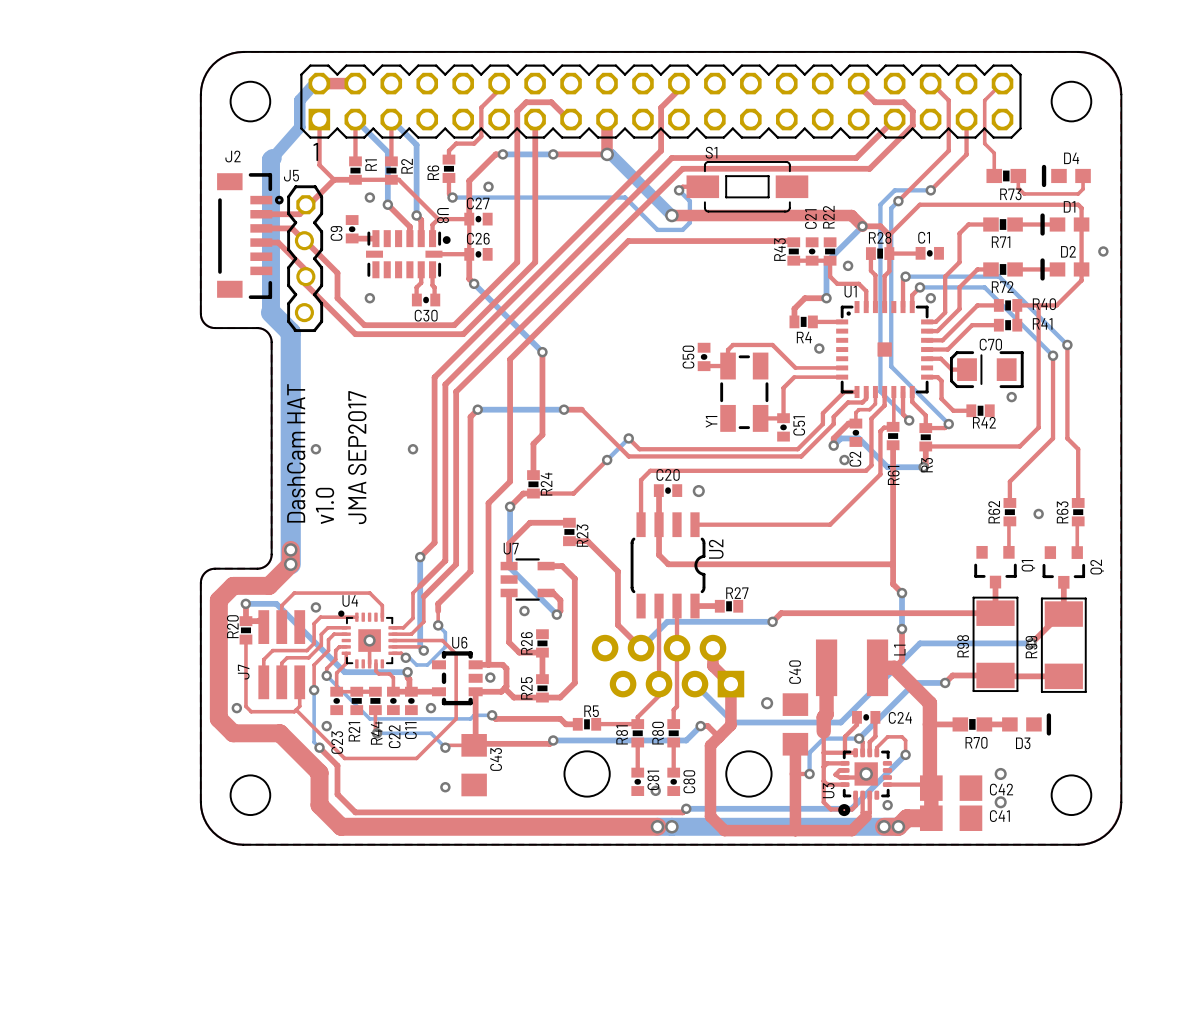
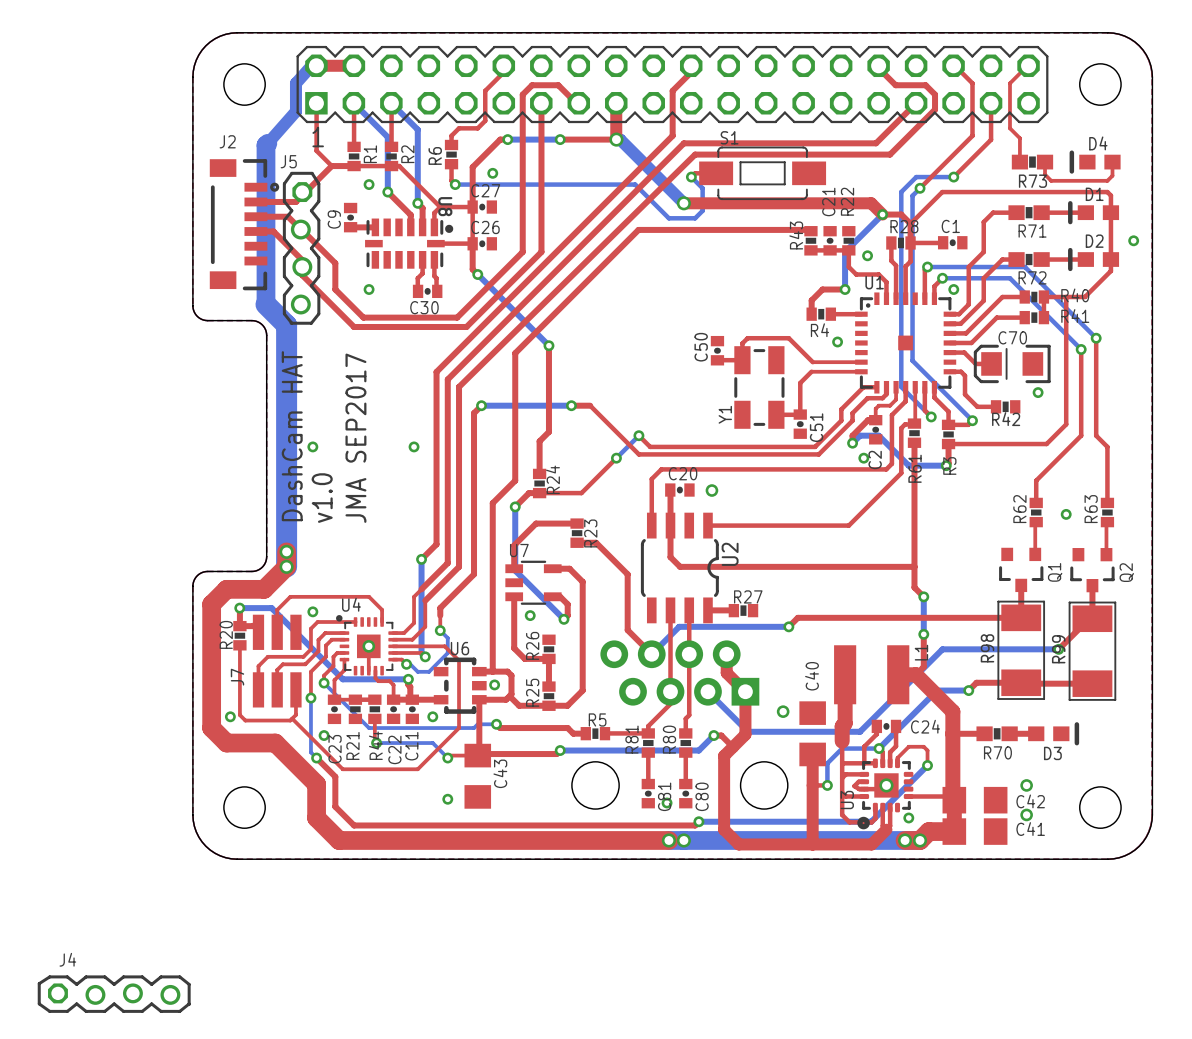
J4: none -> (114, 994)

